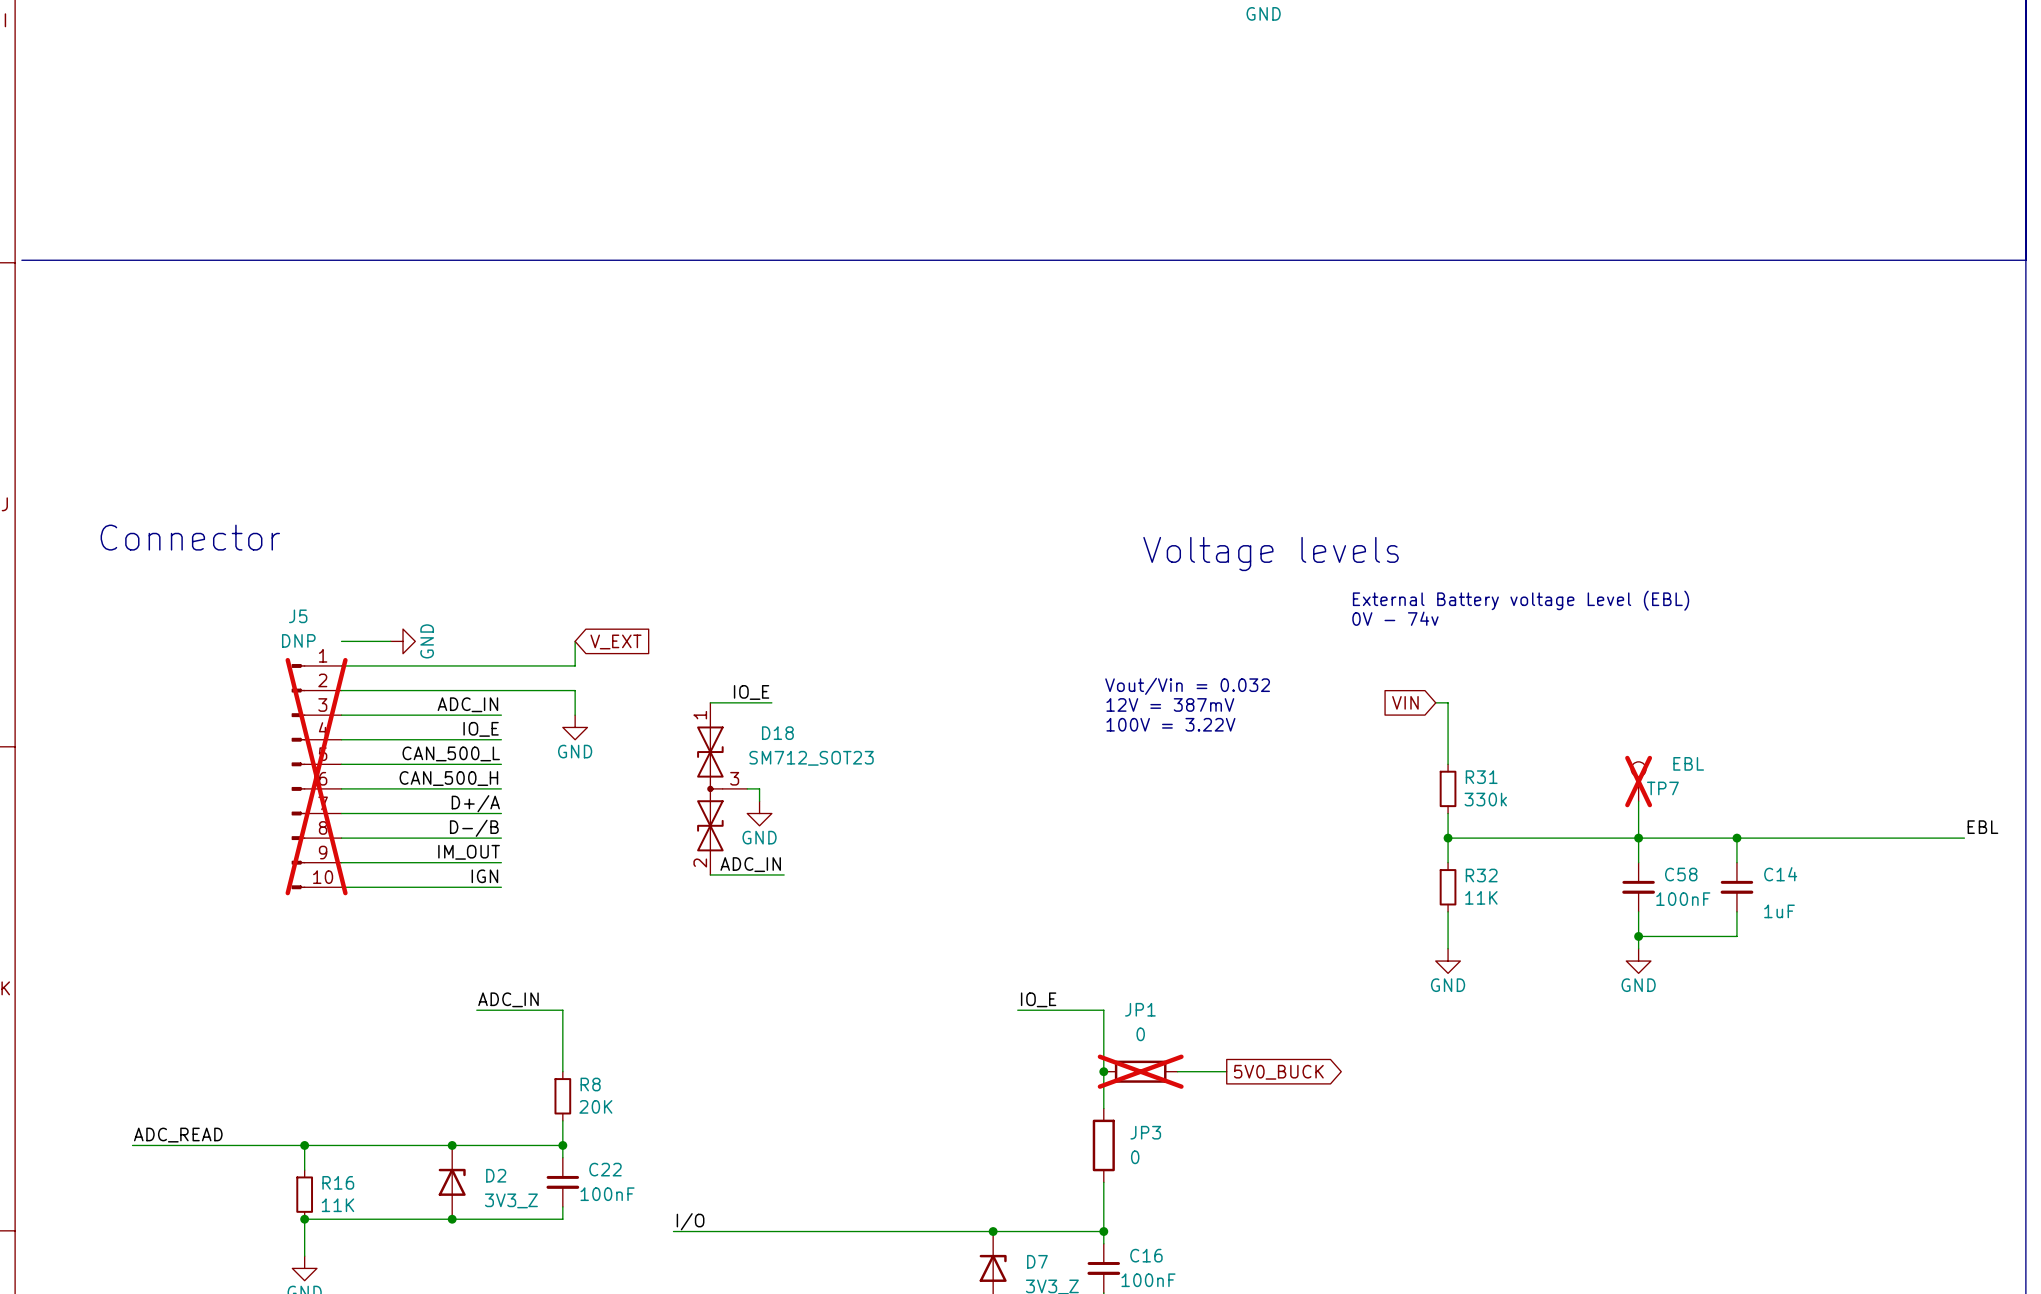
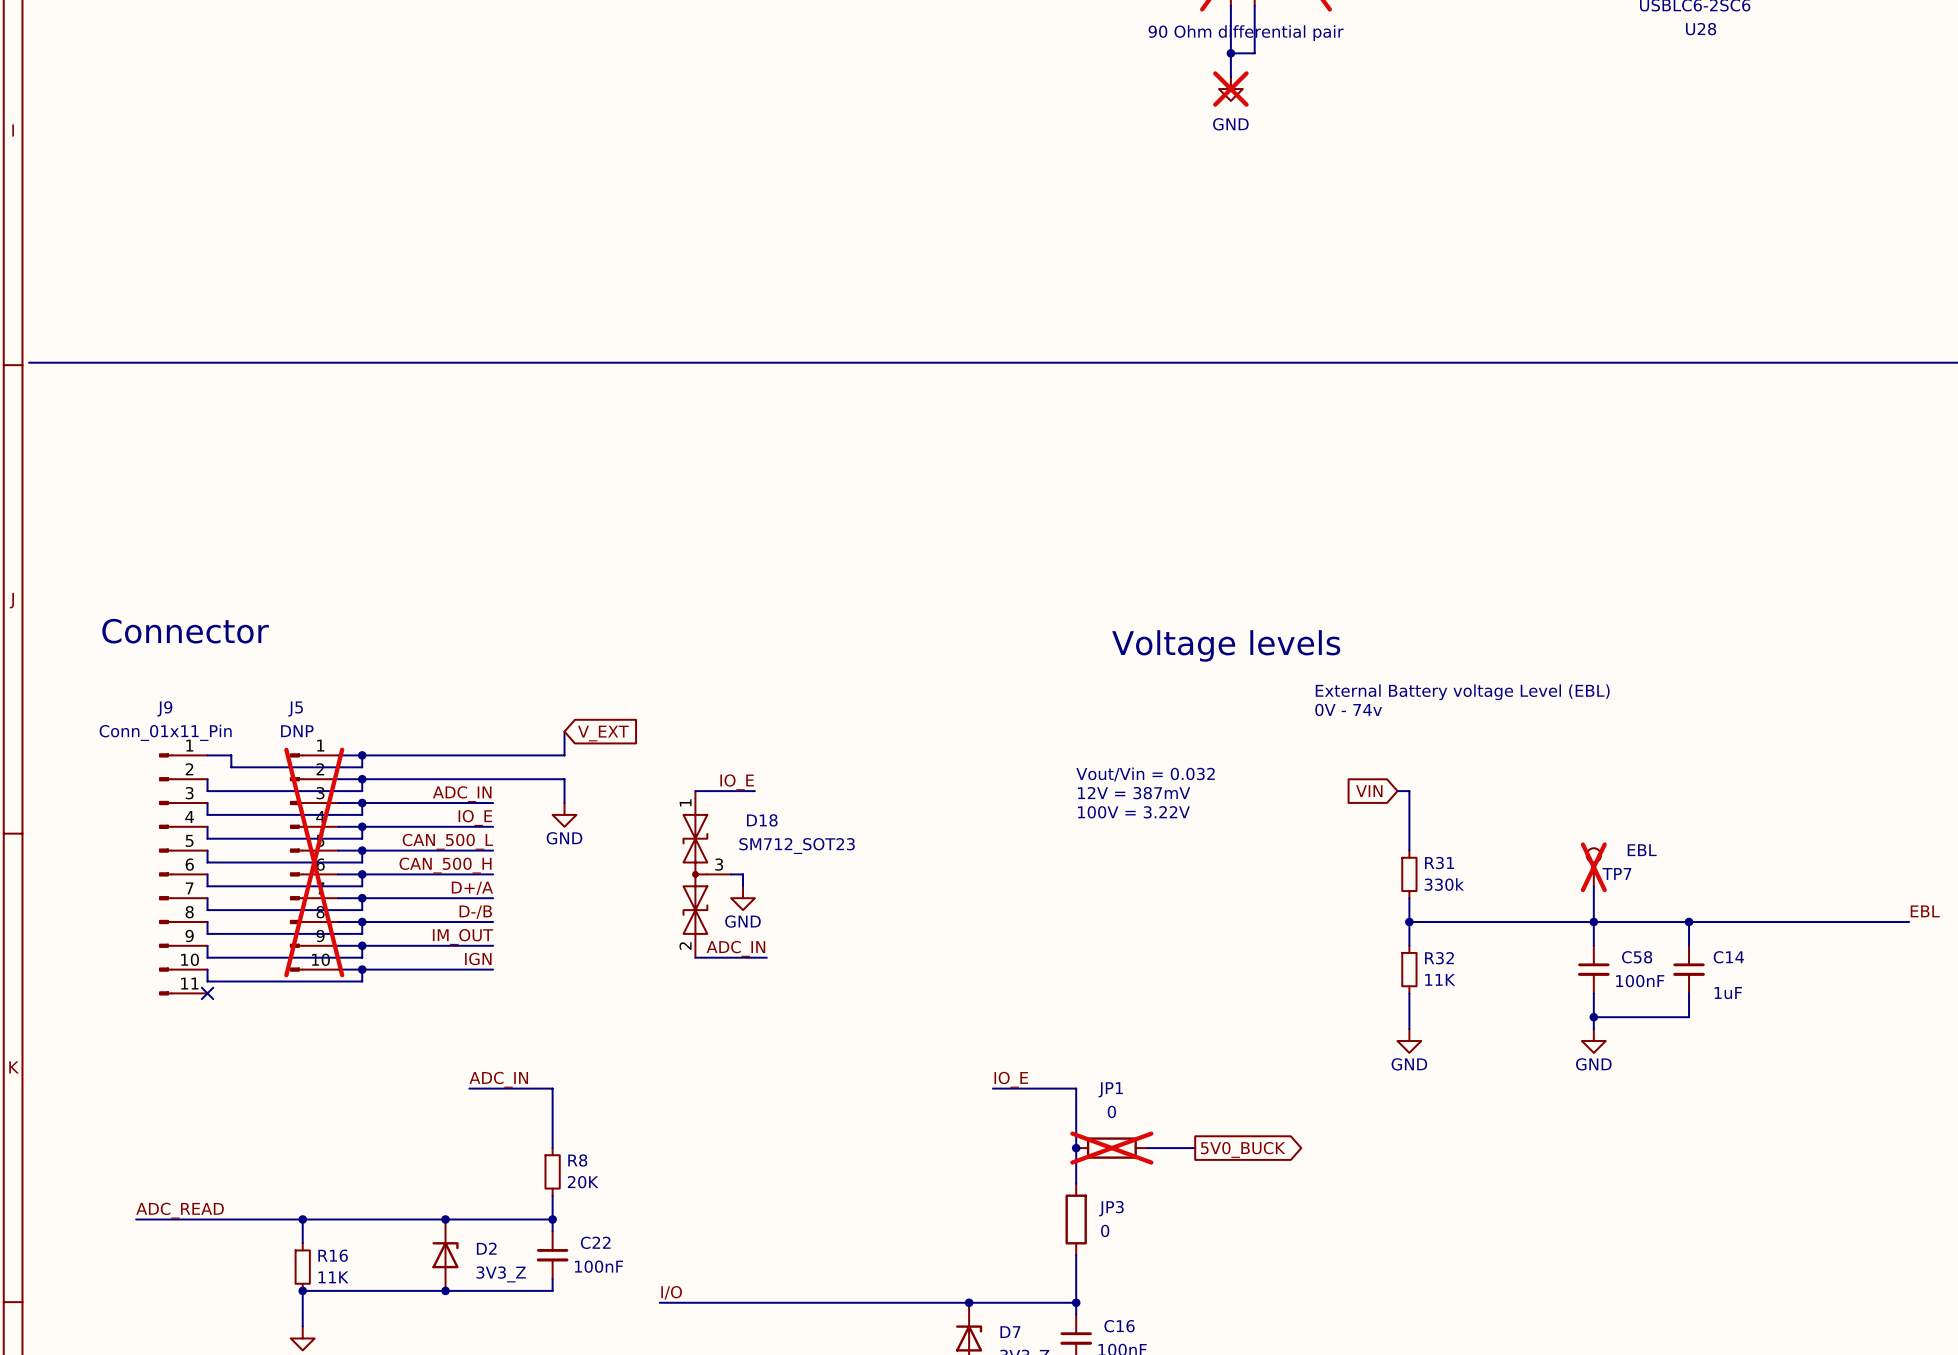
wire: (341, 641) (390, 641) -> none
power symbol: GND (403, 641) -> none
wire: none -> (207, 755) (231, 755) (231, 767) (362, 767) (362, 755)
junction: none -> (362, 755)
wire: none -> (207, 779) (207, 791) (362, 791) (362, 779)
junction: none -> (362, 779)
wire: none -> (207, 803) (207, 814) (362, 814) (362, 803)
junction: none -> (362, 803)
wire: none -> (207, 826) (207, 838) (362, 838) (362, 826)
junction: none -> (362, 826)
wire: none -> (207, 850) (207, 862) (362, 862) (362, 850)
junction: none -> (362, 850)
J9: none -> Conn_01x11_Pin (183, 874)
wire: none -> (207, 874) (207, 886) (362, 886) (362, 874)
junction: none -> (362, 874)
wire: none -> (207, 898) (207, 910) (362, 910) (362, 898)
junction: none -> (362, 898)
wire: none -> (207, 922) (207, 933) (362, 933) (362, 922)
junction: none -> (362, 922)
wire: none -> (207, 945) (207, 957) (362, 957) (362, 945)
junction: none -> (362, 945)
wire: none -> (207, 969) (207, 981) (362, 981) (362, 969)
junction: none -> (362, 969)
no-connect mark: none -> (207, 993)

